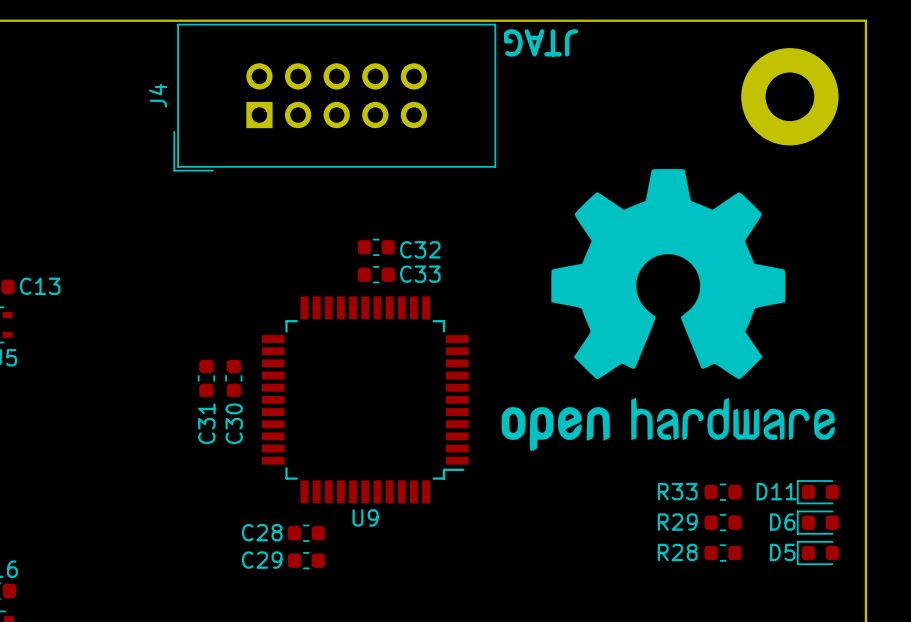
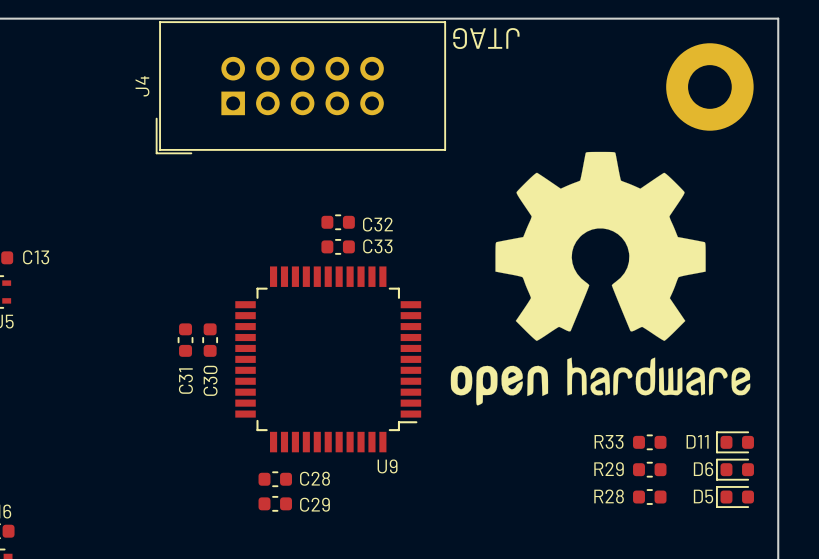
U9 name position: U9 (365, 517) -> U9 (387, 466)
C28 name position: C28 (262, 532) -> C28 (315, 478)
C29 name position: C29 (262, 560) -> C29 (314, 504)

